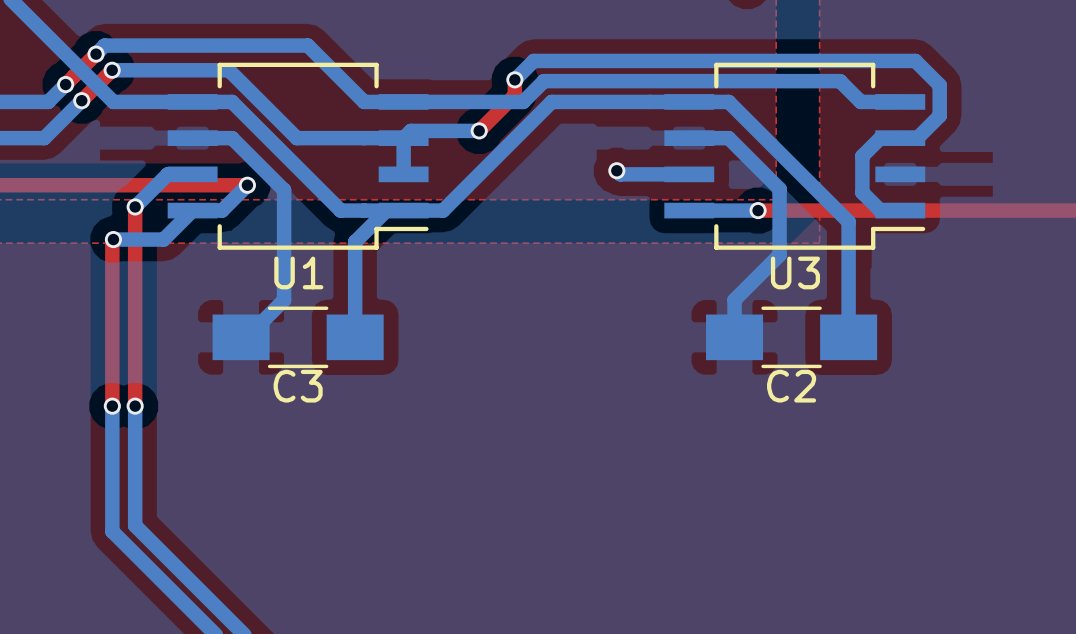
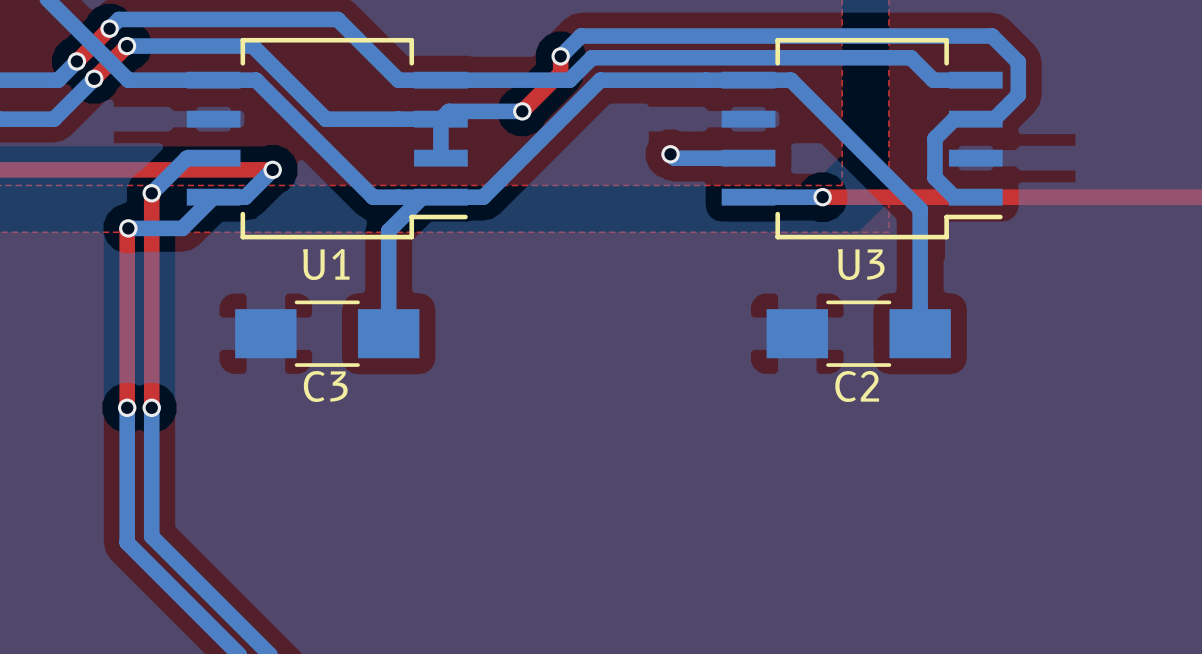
bottom track: (192, 138) (232, 138) (284, 190) (284, 300) (246, 337) (241, 337) -> none
bottom track: (689, 138) (728, 138) (779, 189) (779, 255) (734, 300) (734, 337) -> none

